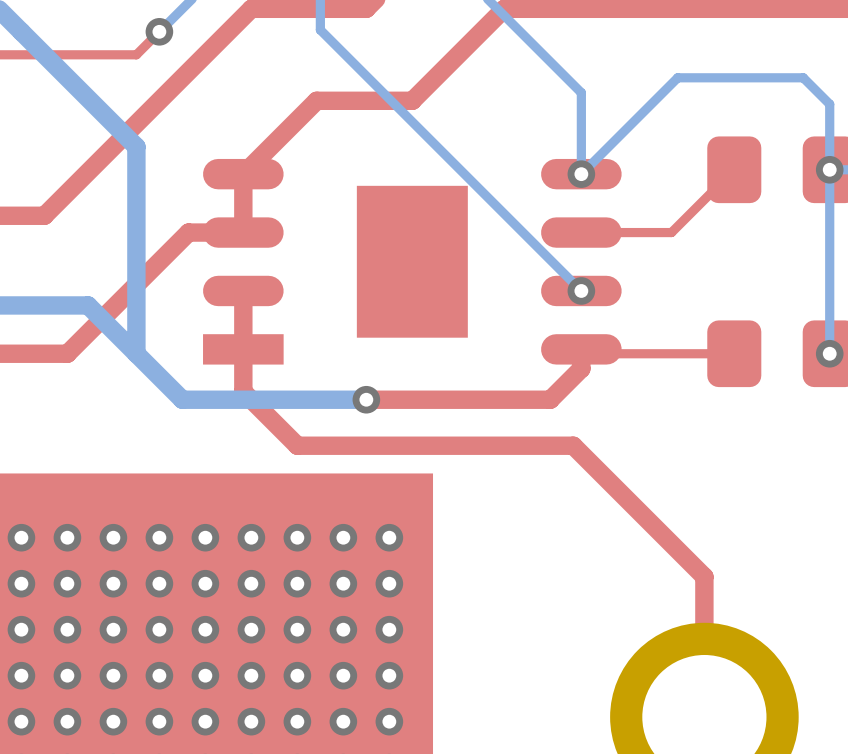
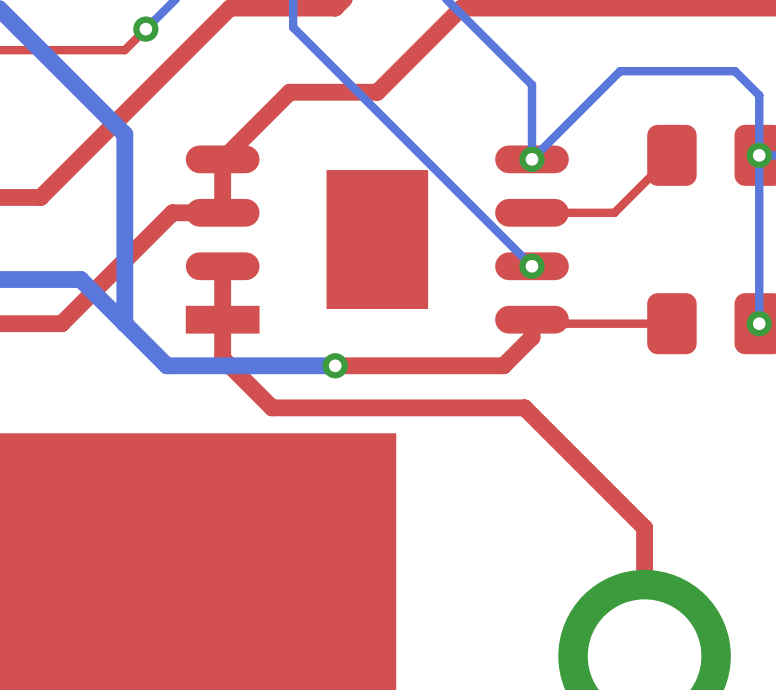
via: (21, 537) -> none
via: (67, 537) -> none
via: (113, 537) -> none
via: (159, 537) -> none
via: (205, 537) -> none
via: (251, 537) -> none
via: (297, 537) -> none
via: (343, 537) -> none
via: (389, 537) -> none
via: (21, 583) -> none
via: (67, 583) -> none
via: (113, 583) -> none
via: (159, 583) -> none
via: (205, 583) -> none
via: (251, 583) -> none
via: (297, 583) -> none
via: (343, 583) -> none
via: (389, 583) -> none
via: (21, 629) -> none
via: (67, 629) -> none
via: (113, 629) -> none
via: (159, 629) -> none
via: (205, 629) -> none
via: (251, 629) -> none
via: (297, 629) -> none
via: (343, 629) -> none
via: (389, 629) -> none
via: (21, 675) -> none
via: (67, 675) -> none
via: (113, 675) -> none
via: (159, 675) -> none
via: (205, 675) -> none
via: (251, 675) -> none
via: (297, 675) -> none
via: (343, 675) -> none
via: (389, 675) -> none
via: (21, 721) -> none
via: (67, 721) -> none
via: (113, 721) -> none
via: (159, 721) -> none
via: (205, 721) -> none
via: (251, 721) -> none
via: (297, 721) -> none
via: (343, 721) -> none
via: (389, 721) -> none

